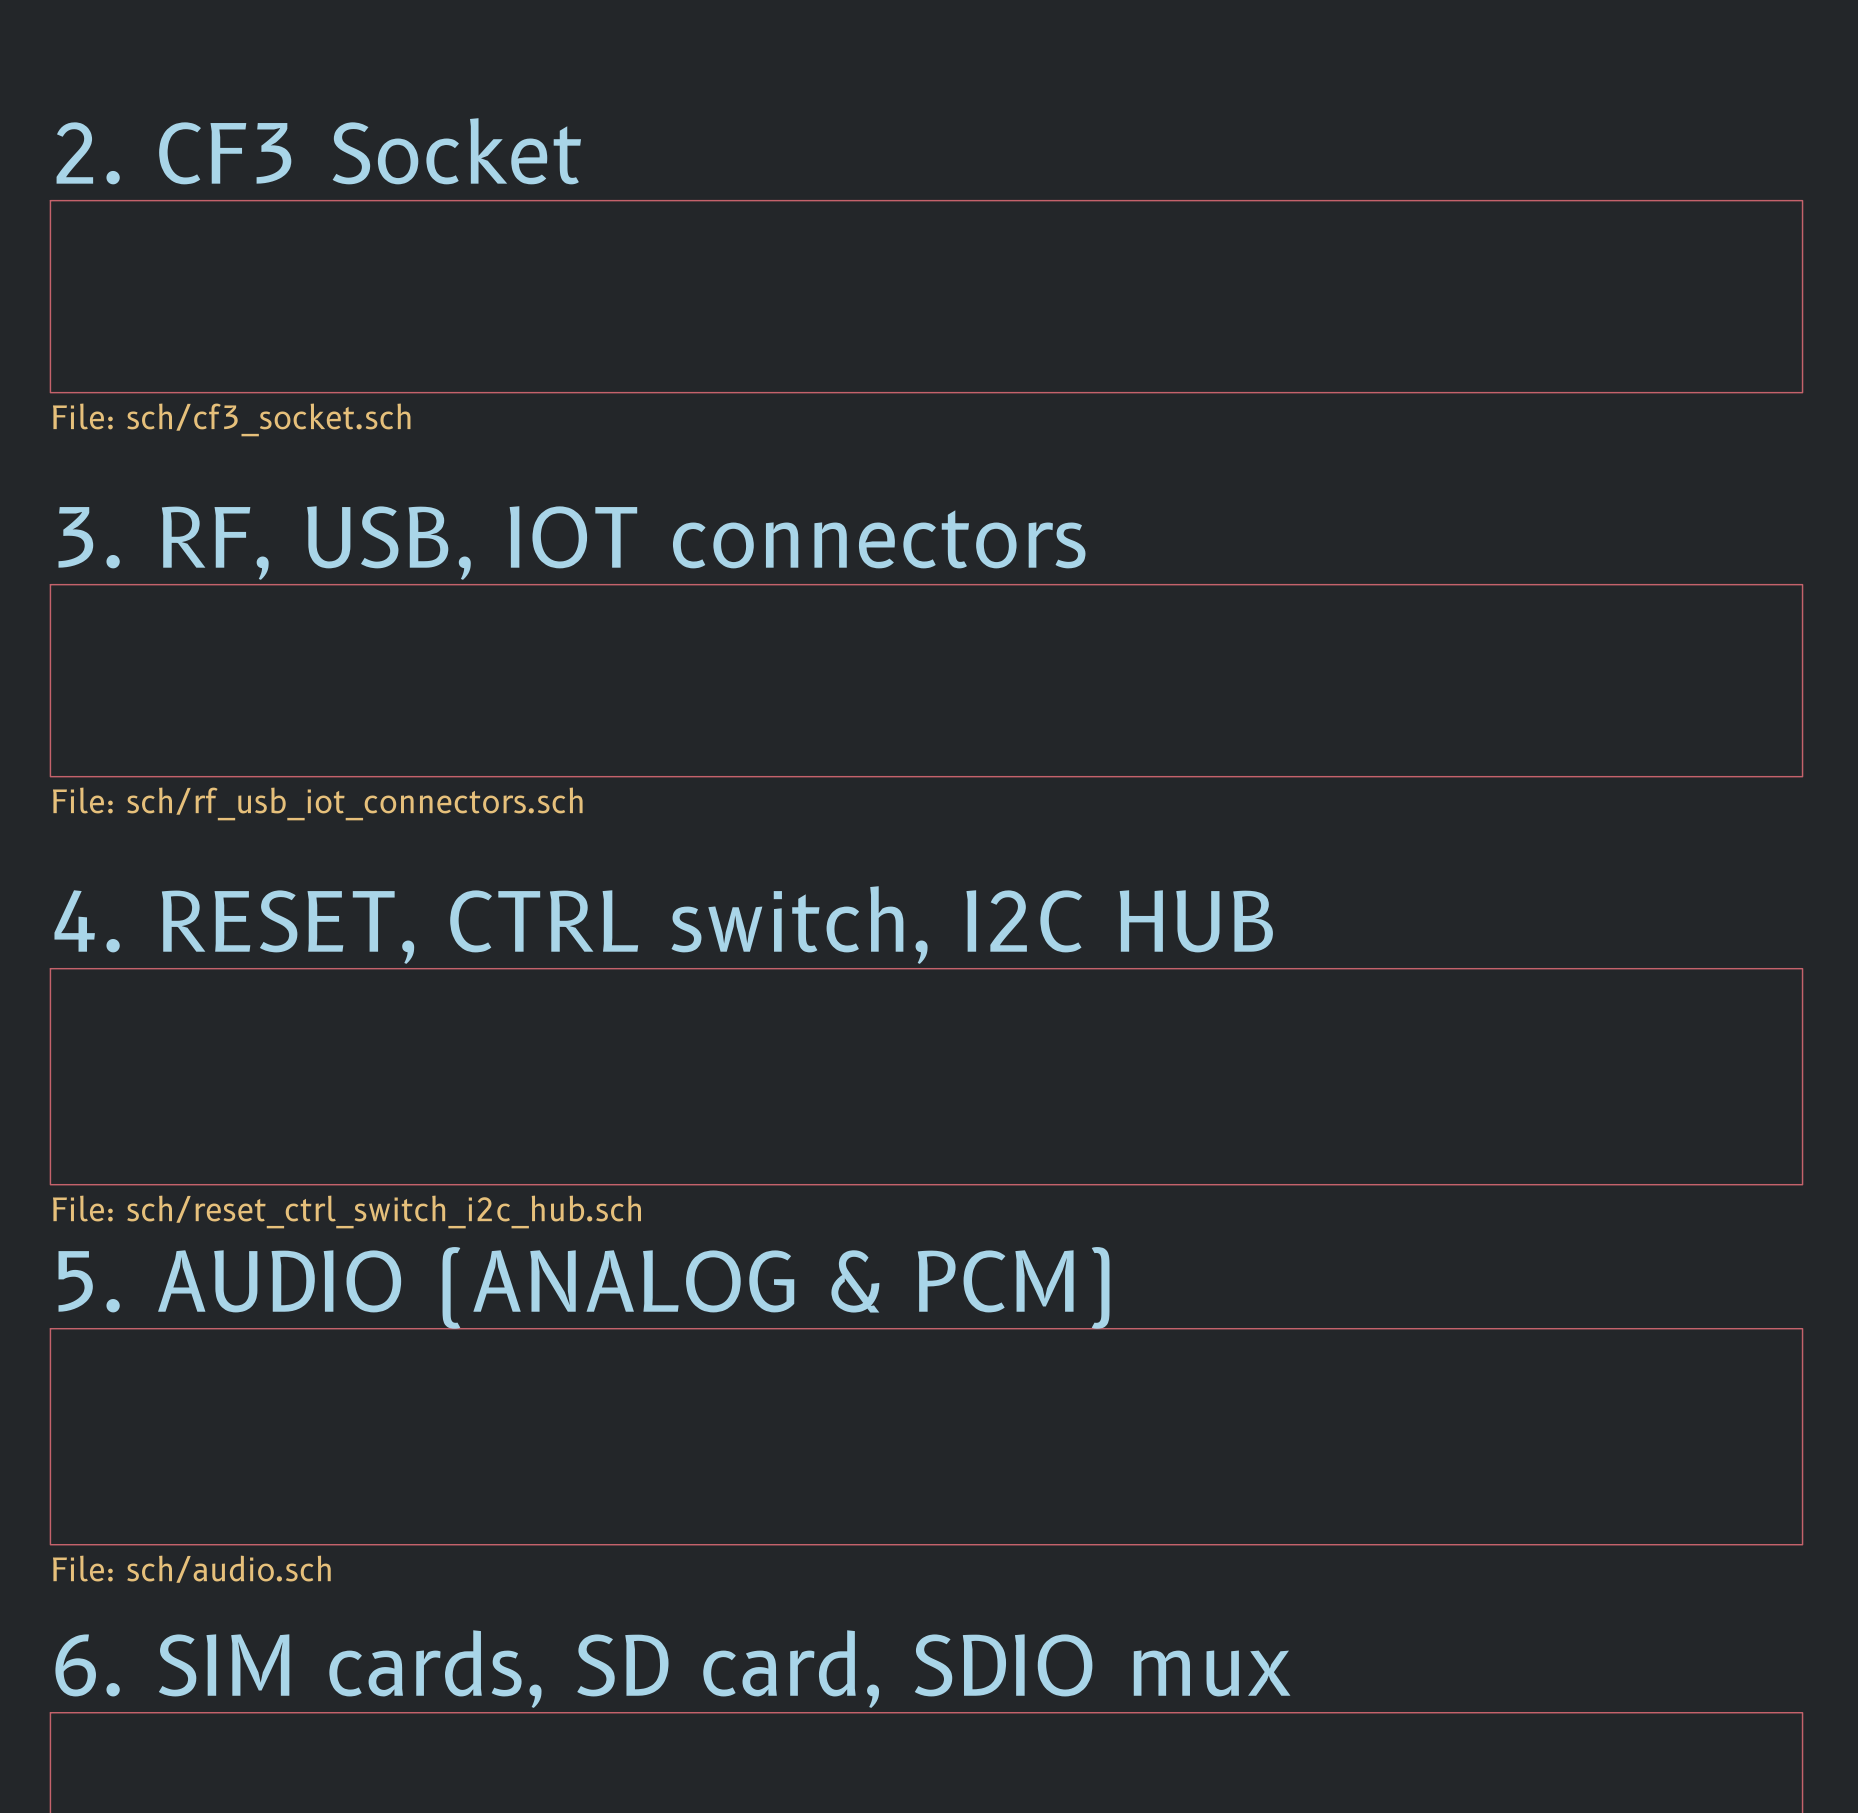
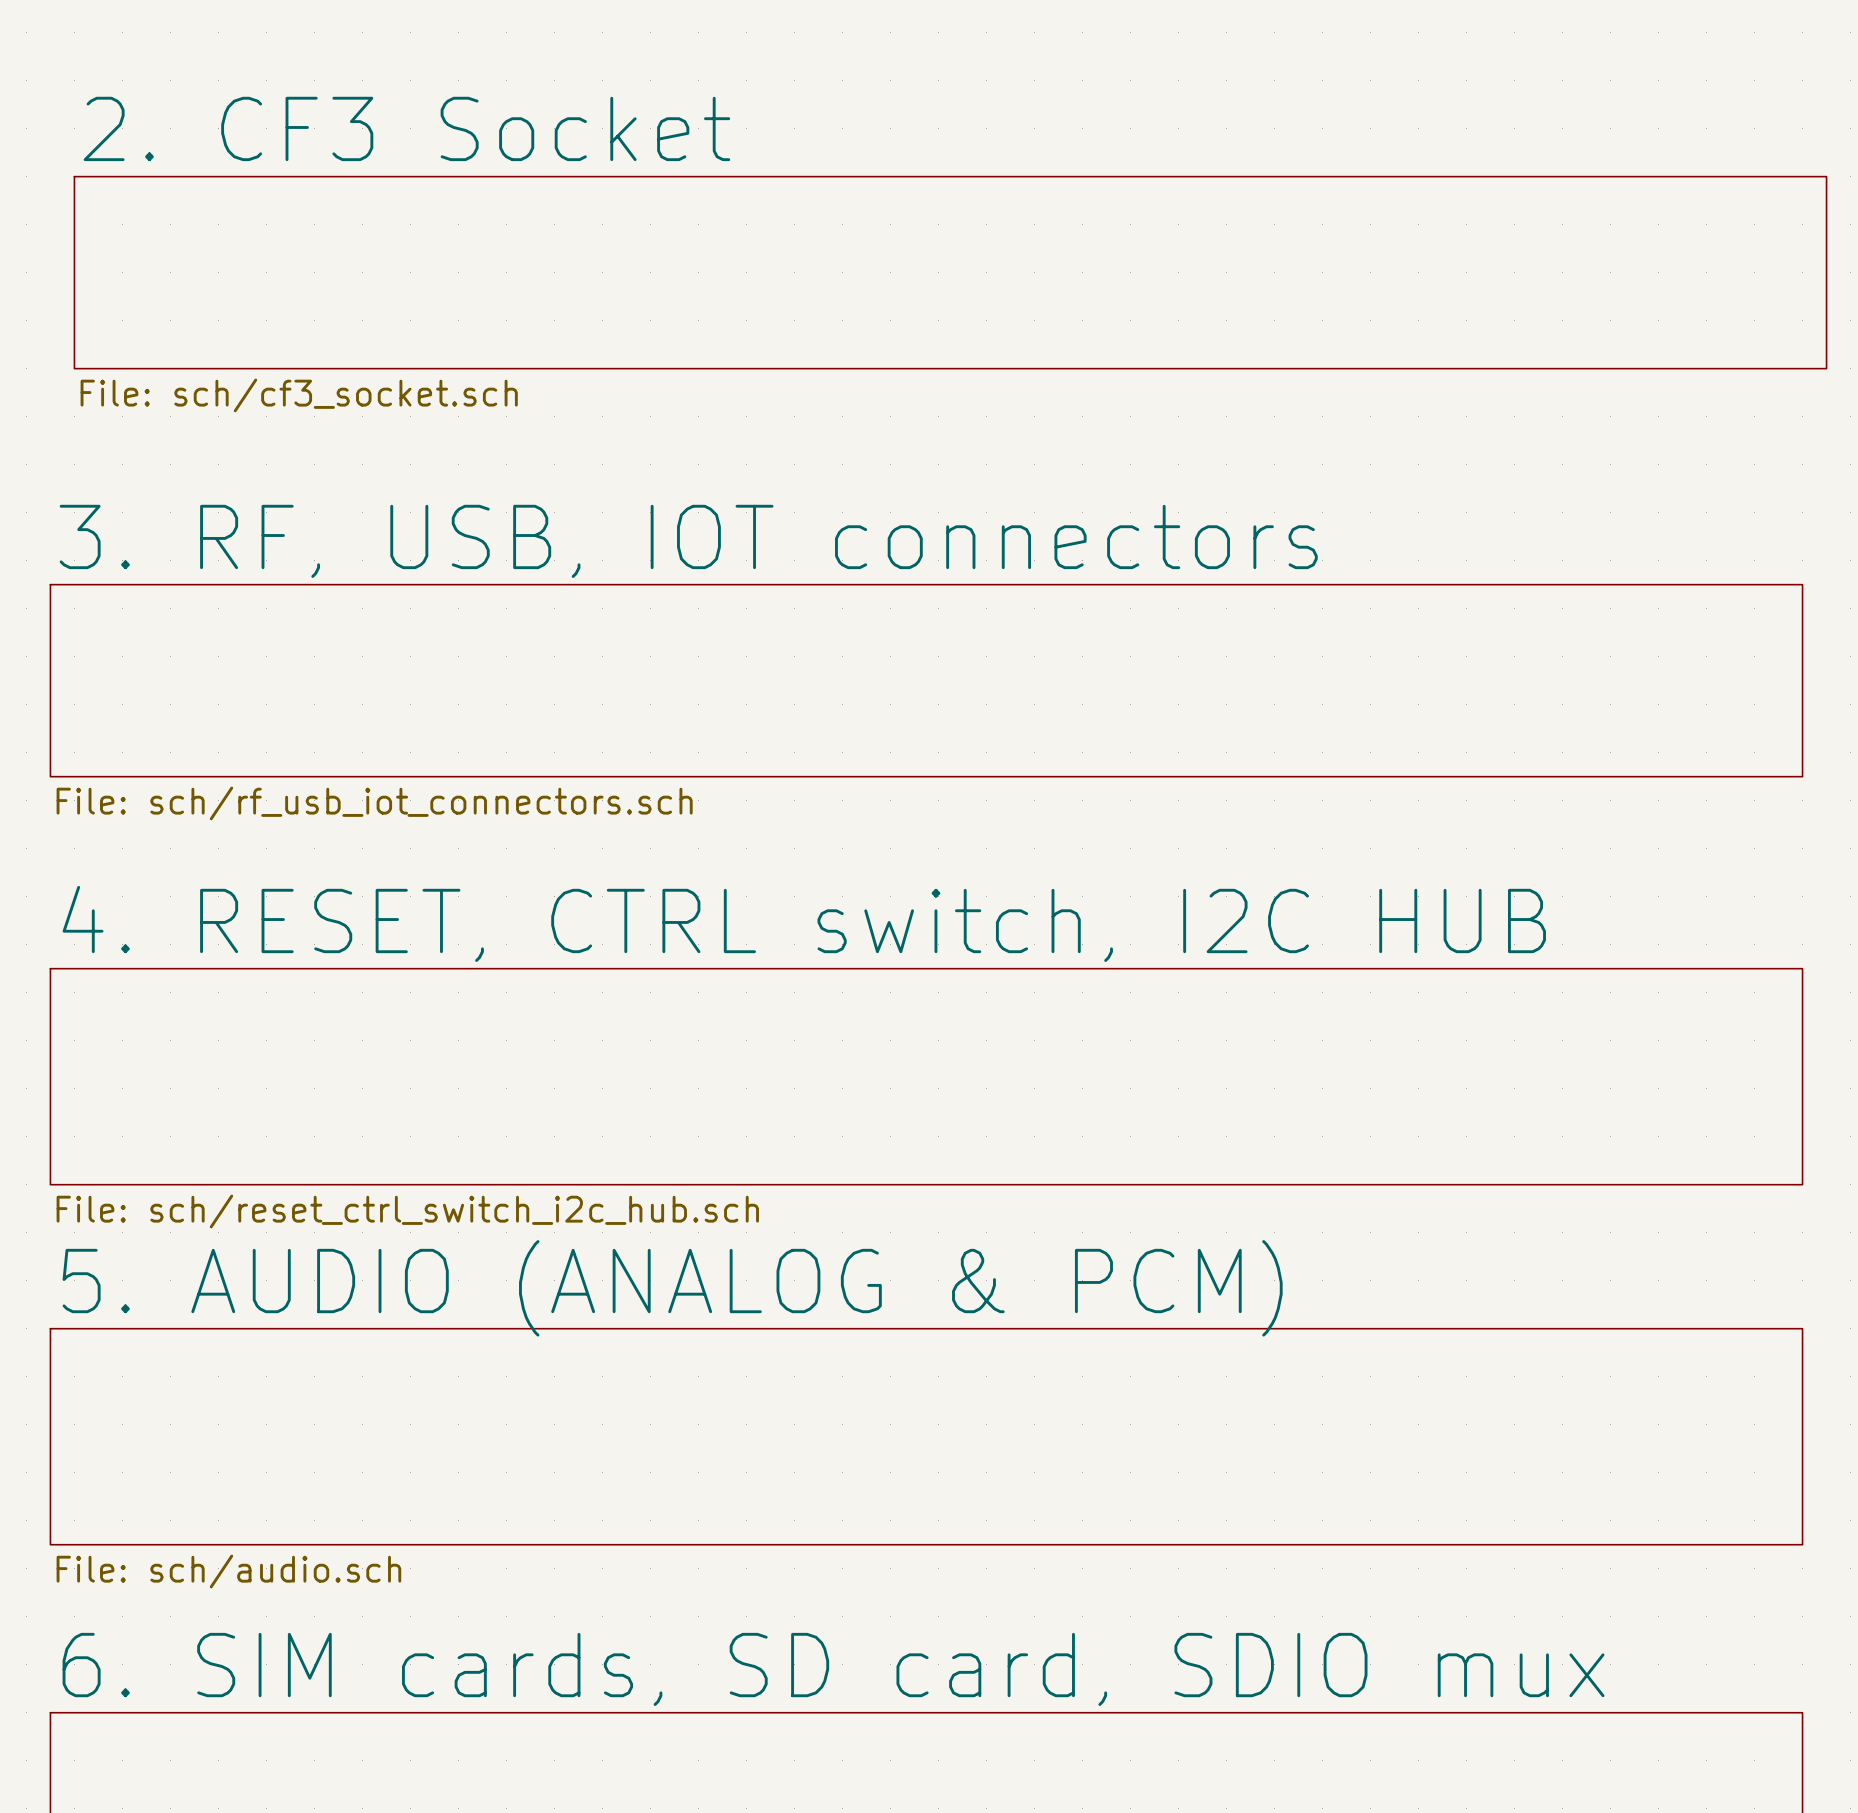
sheet 2. CF3 Socket position: (926, 296) -> (950, 272)

